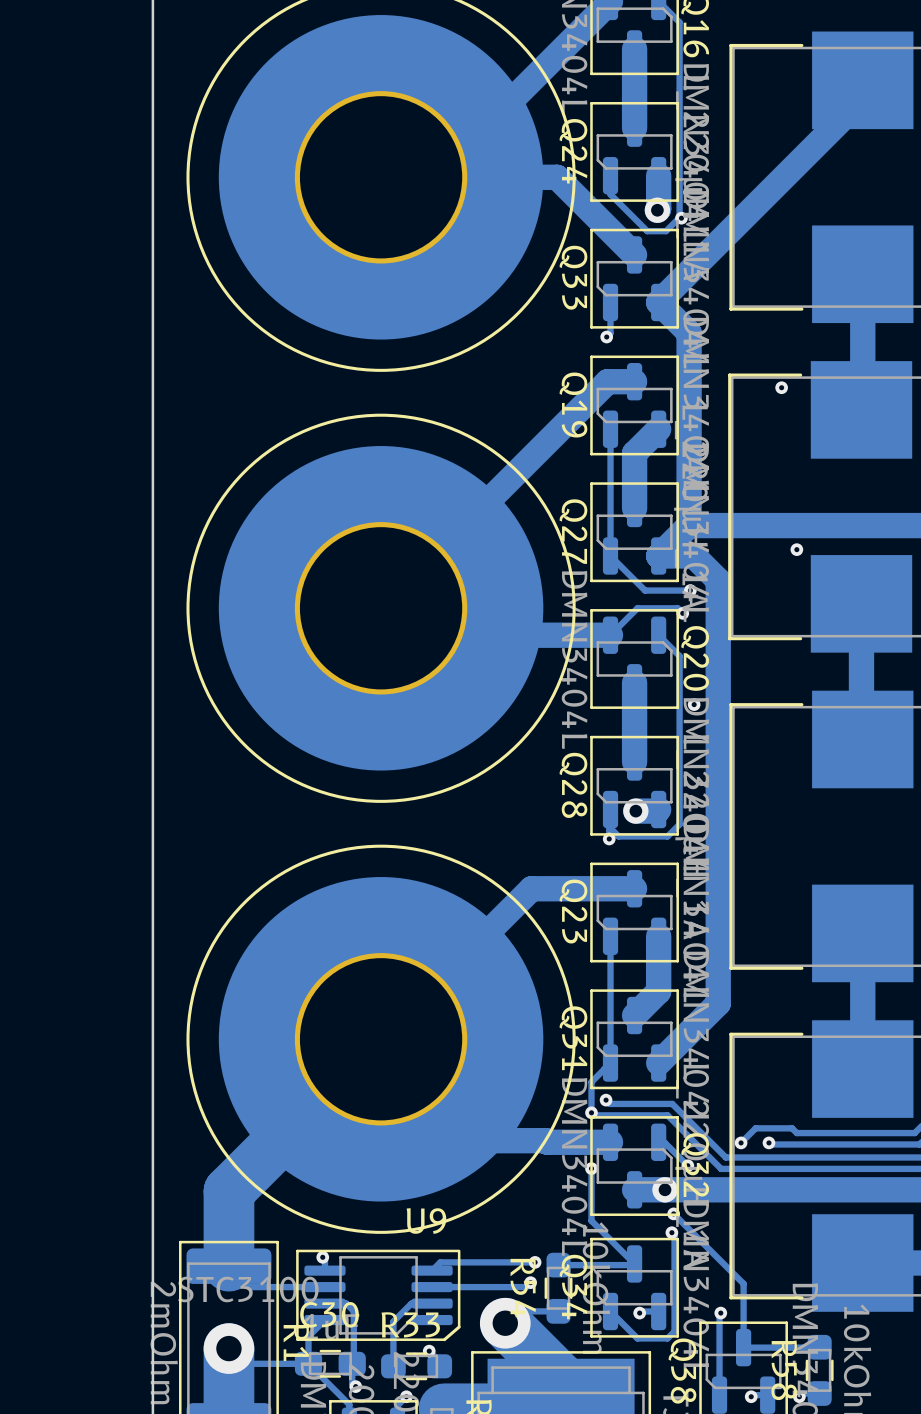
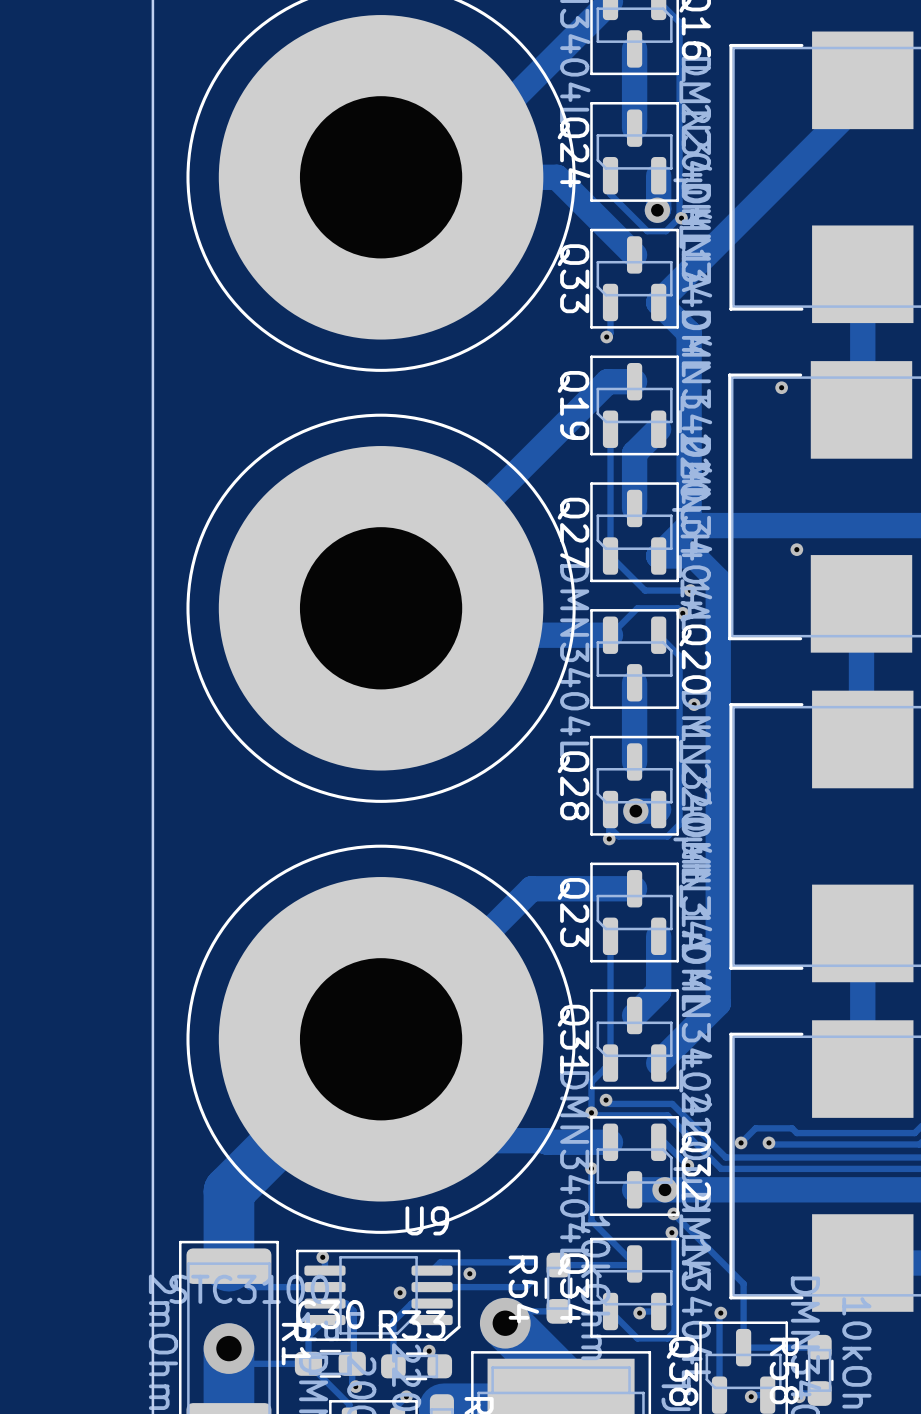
via: (535, 1262) -> none
via: none -> (469, 1273)
via: (530, 1282) -> none
via: none -> (400, 1292)

